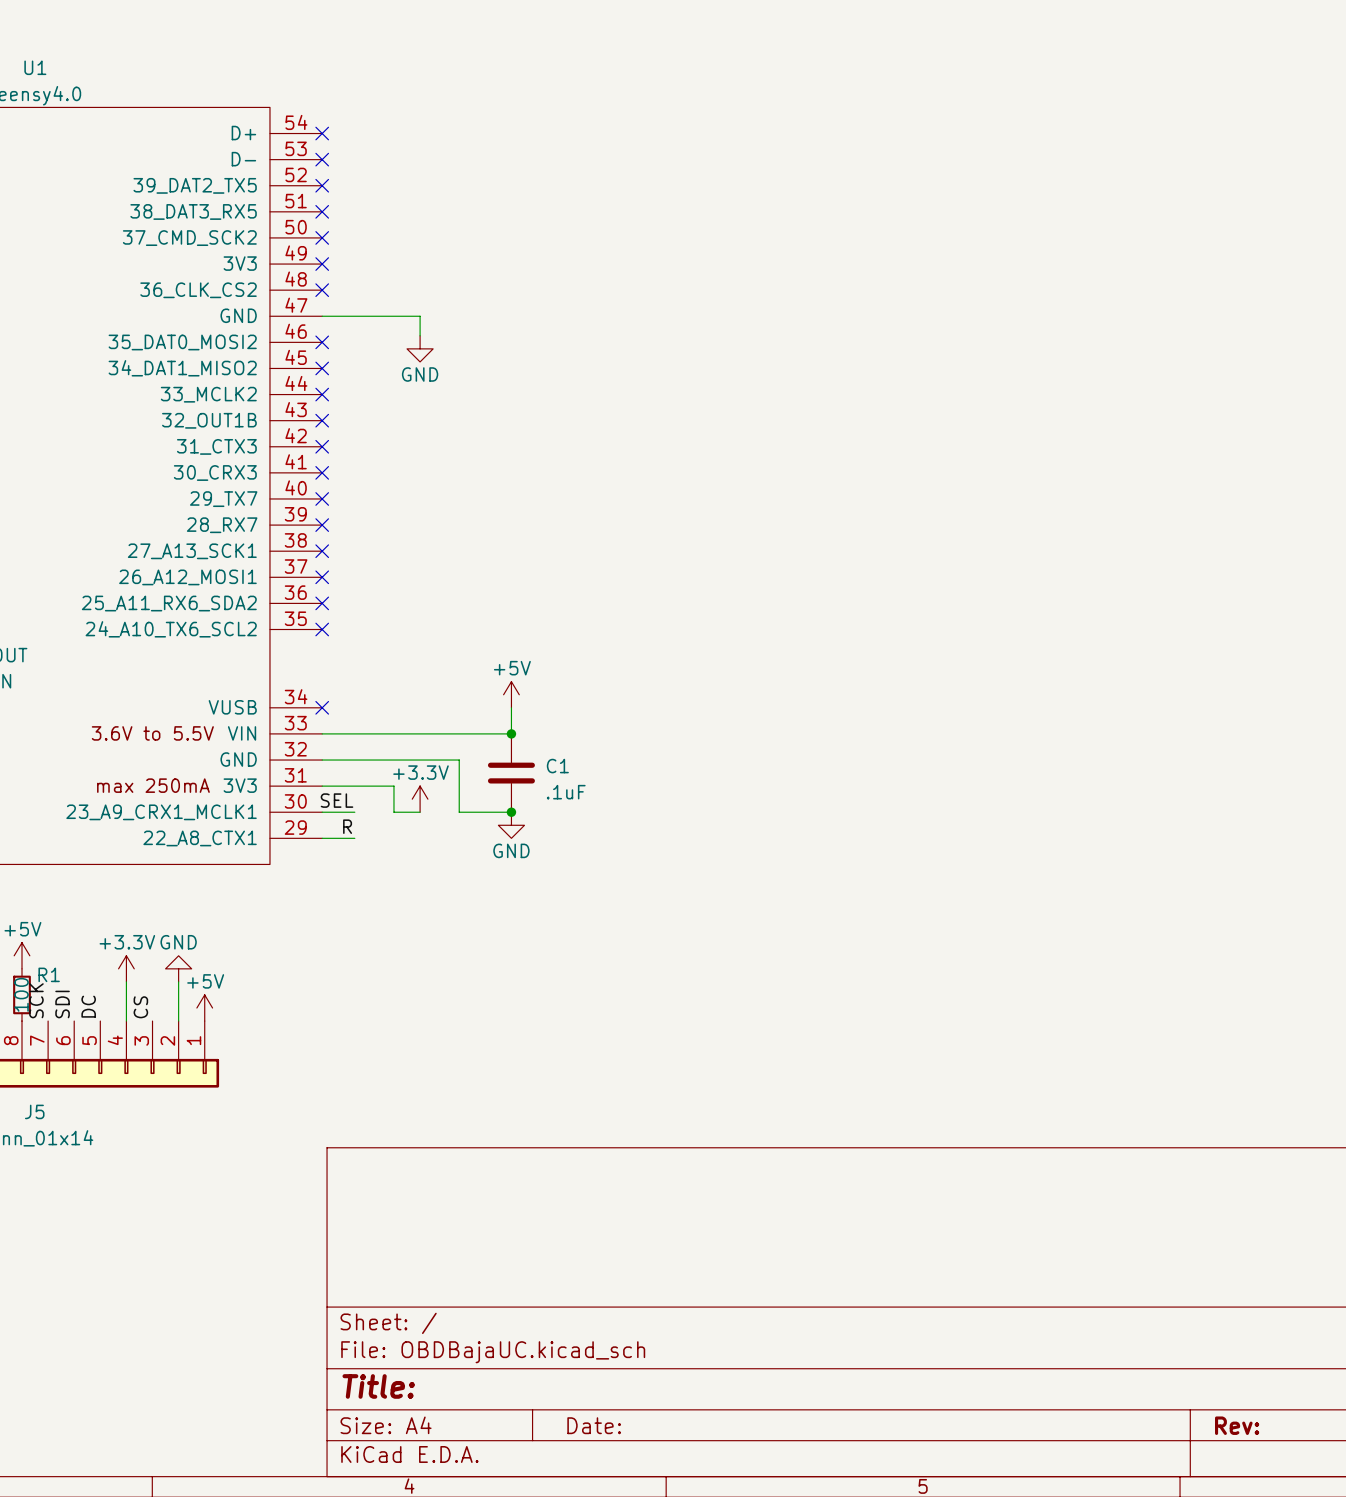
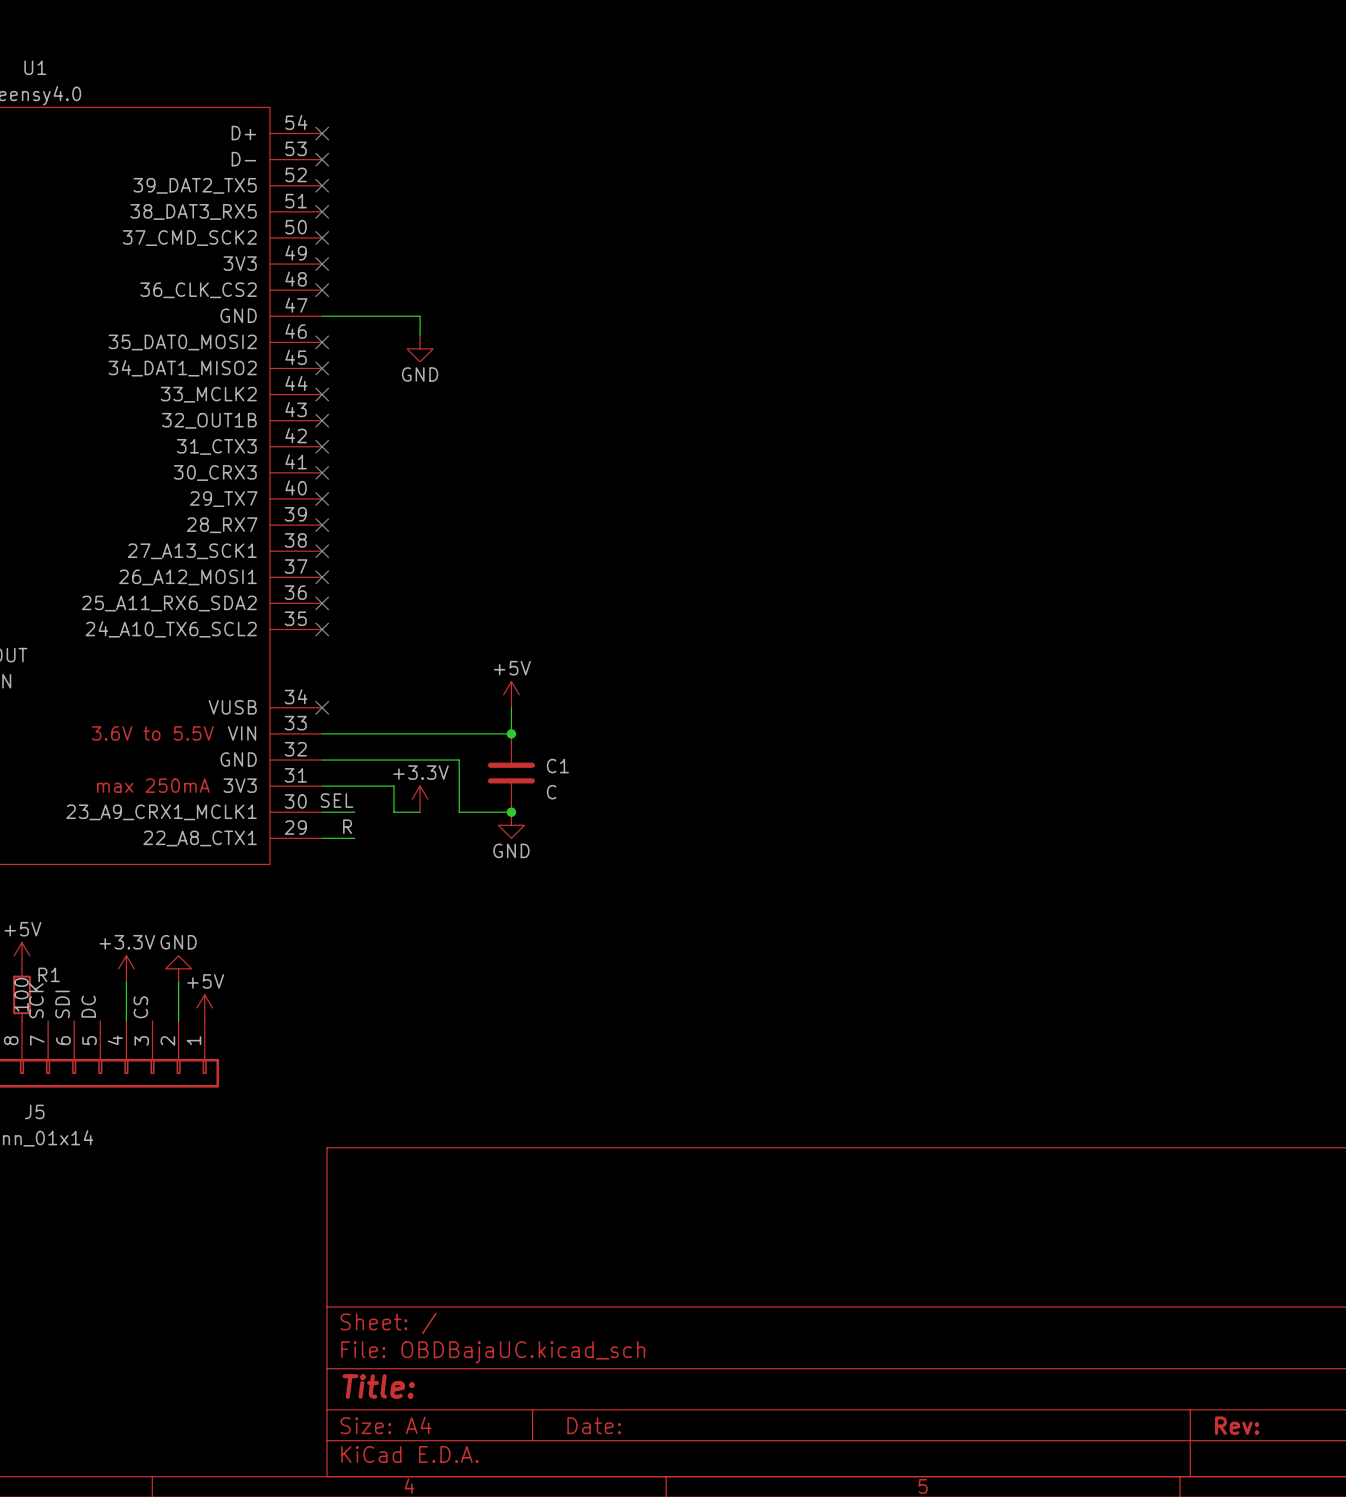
C1 value: .1uF (566, 792) -> C (551, 792)

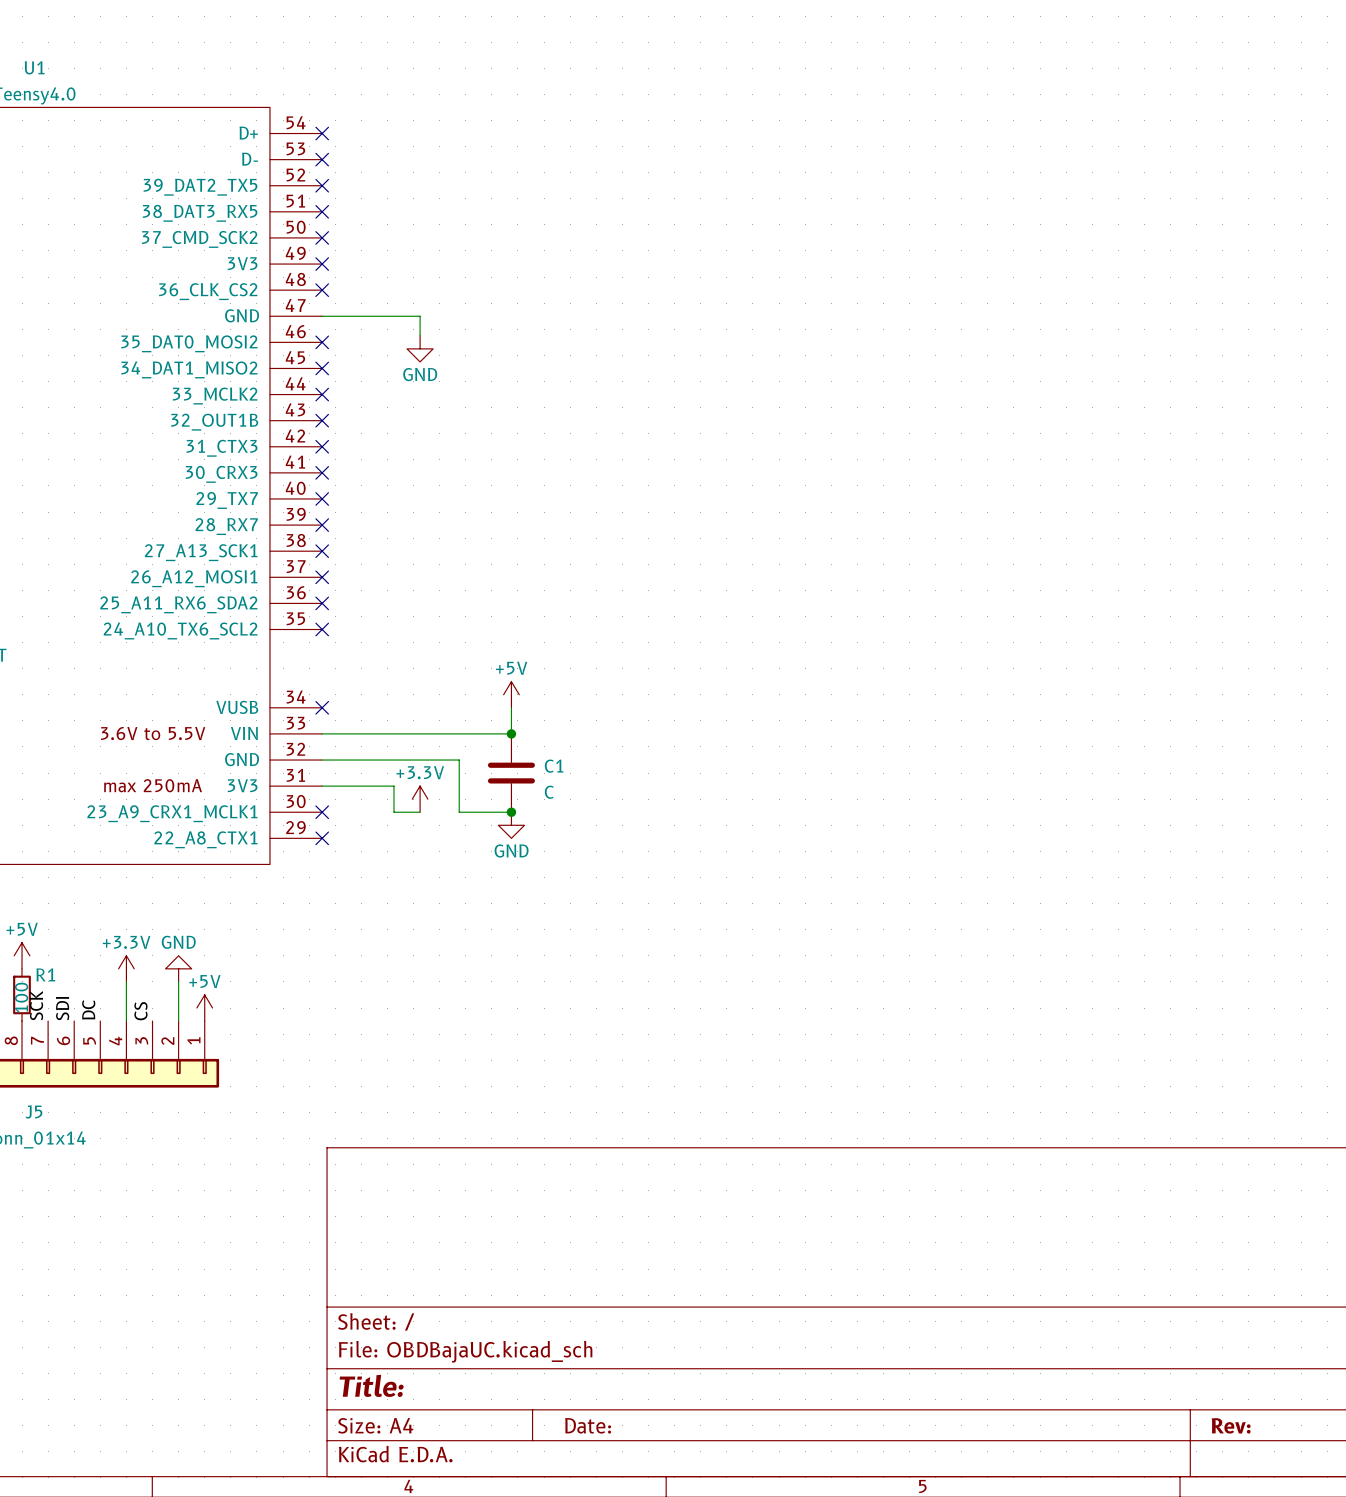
label: SEL (337, 800) -> none
wire: (322, 812) (354, 812) -> none
no-connect mark: none -> (322, 812)
label: R (347, 826) -> none
wire: (322, 838) (354, 838) -> none
no-connect mark: none -> (322, 838)

